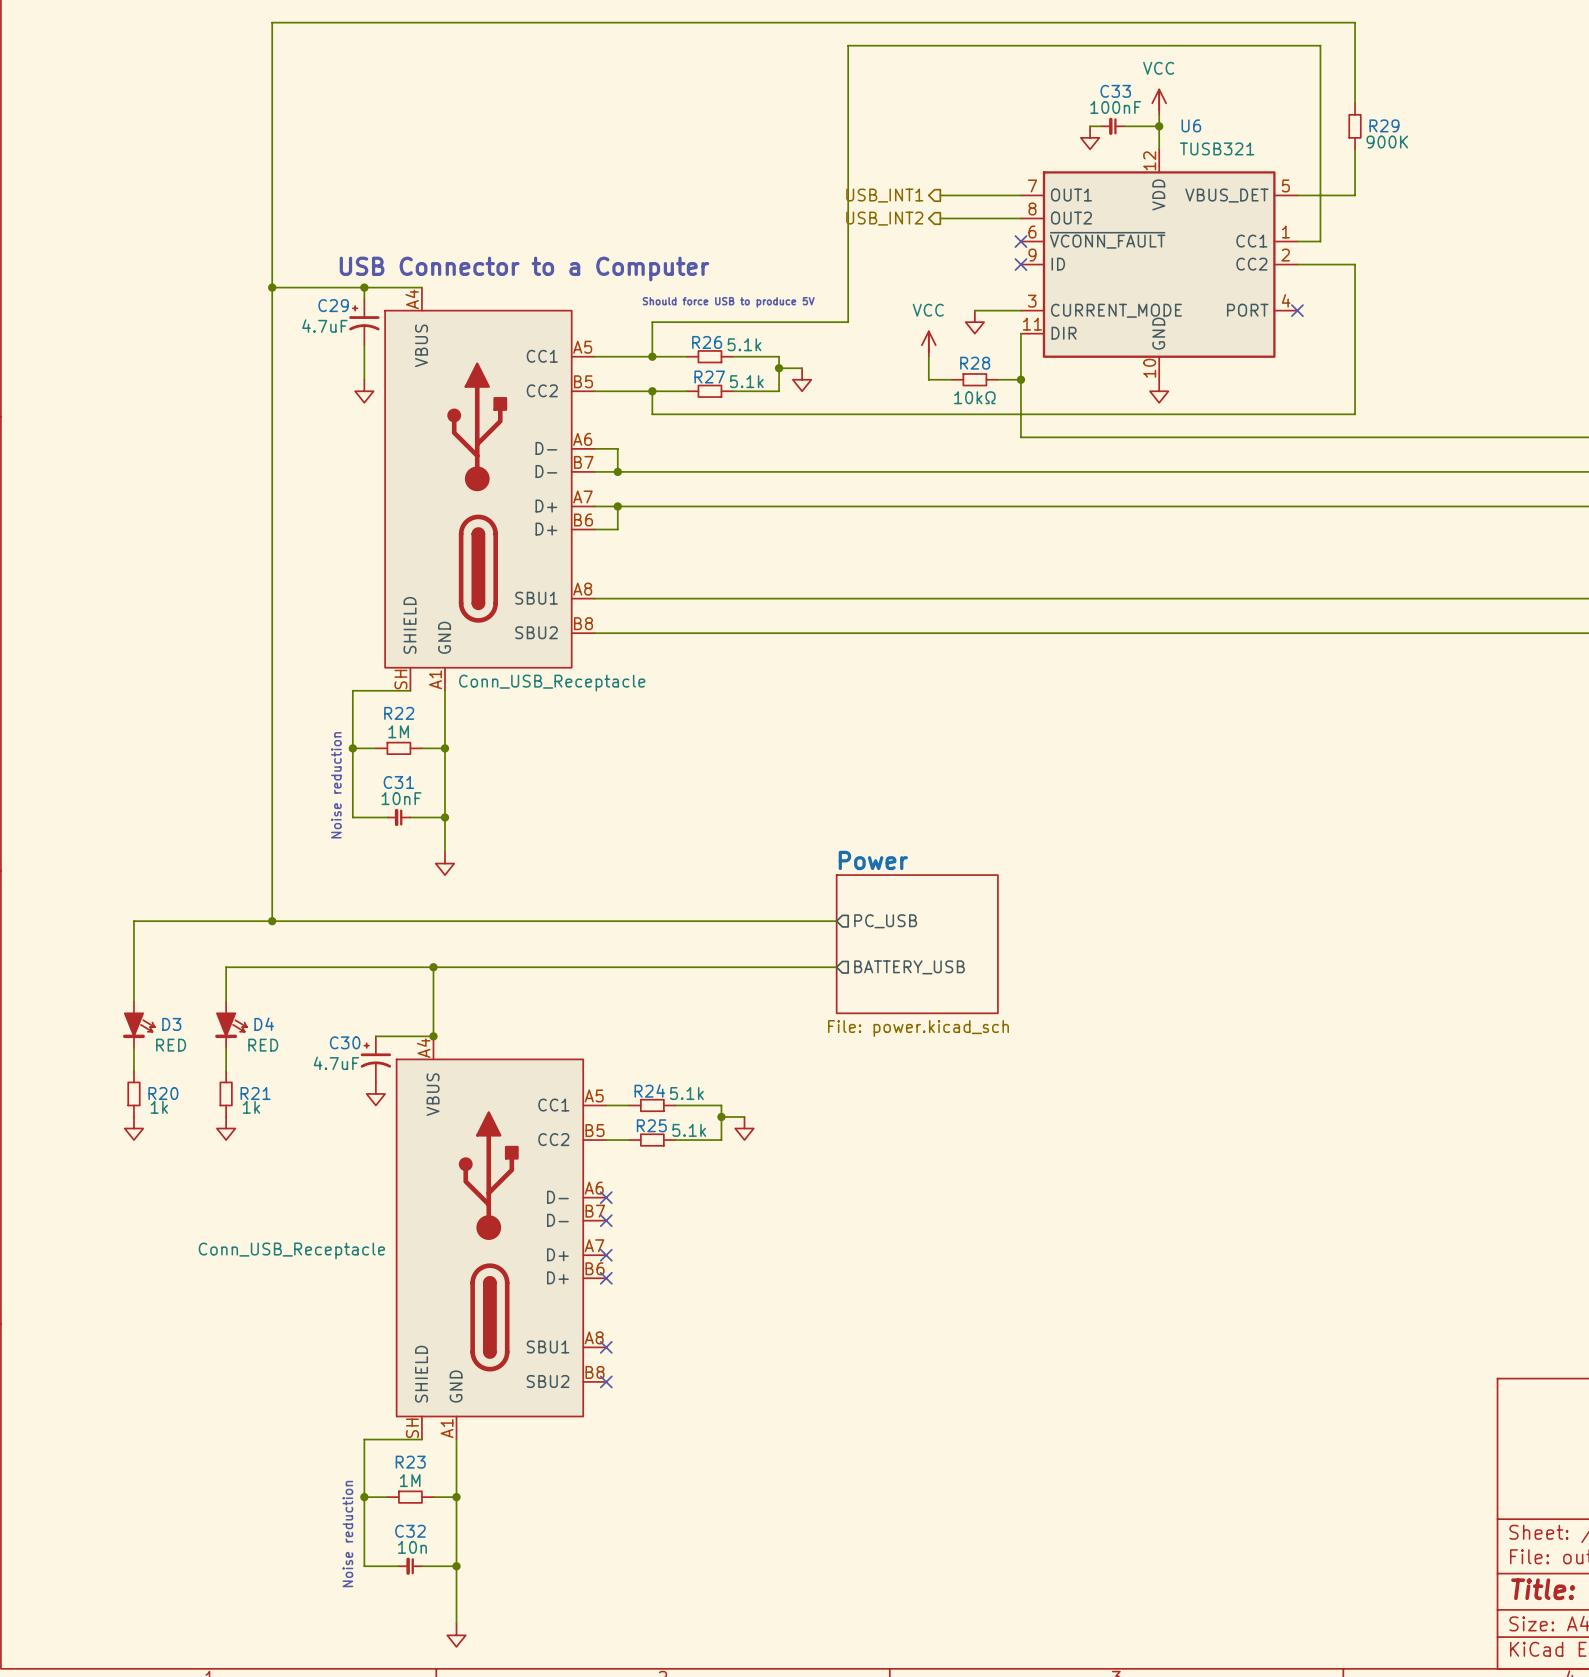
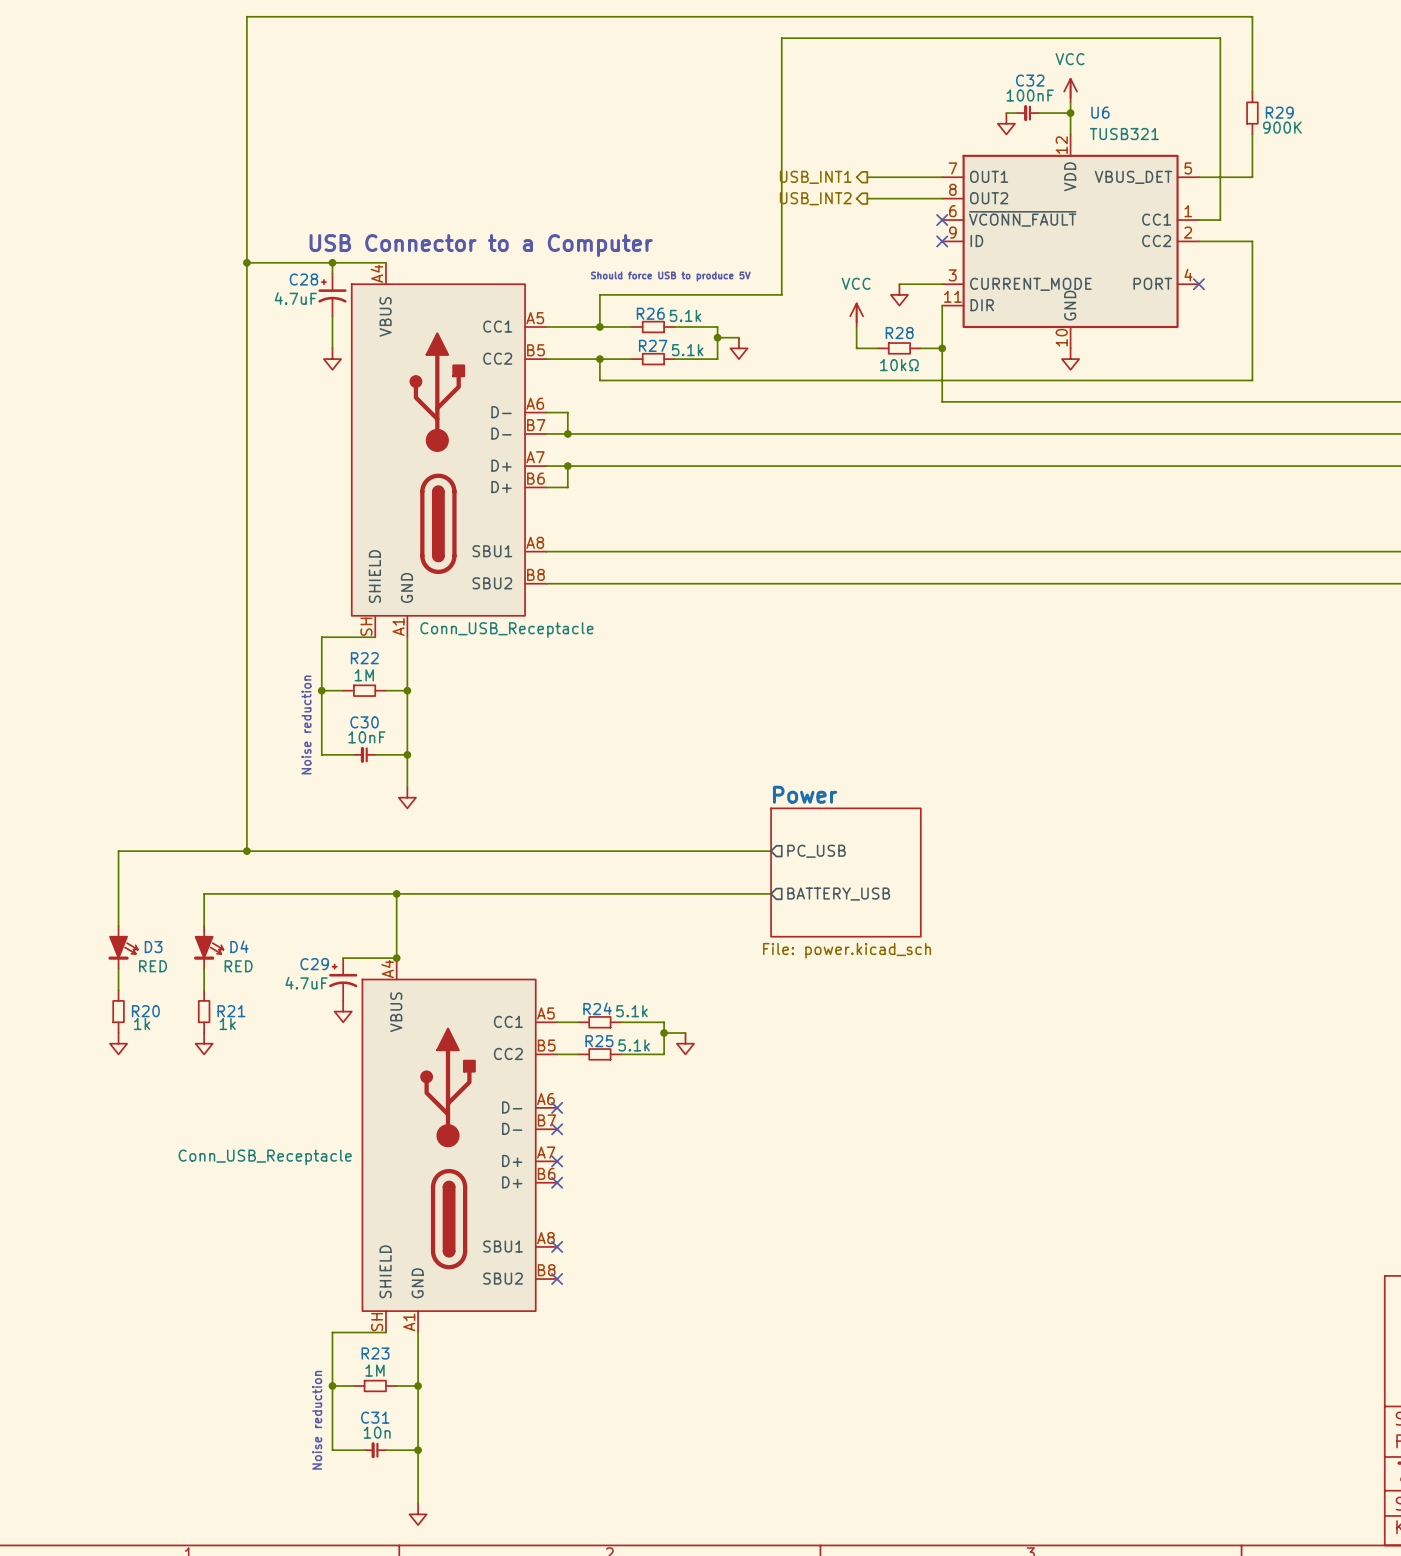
C33 name: C33 (1115, 91) -> C32 (1030, 80)
C29 name: C29 (333, 305) -> C28 (303, 279)
C31 name: C31 (398, 782) -> C30 (364, 722)
C30 name: C30 (345, 1042) -> C29 (314, 964)
C32 name: C32 (410, 1531) -> C31 (375, 1417)

